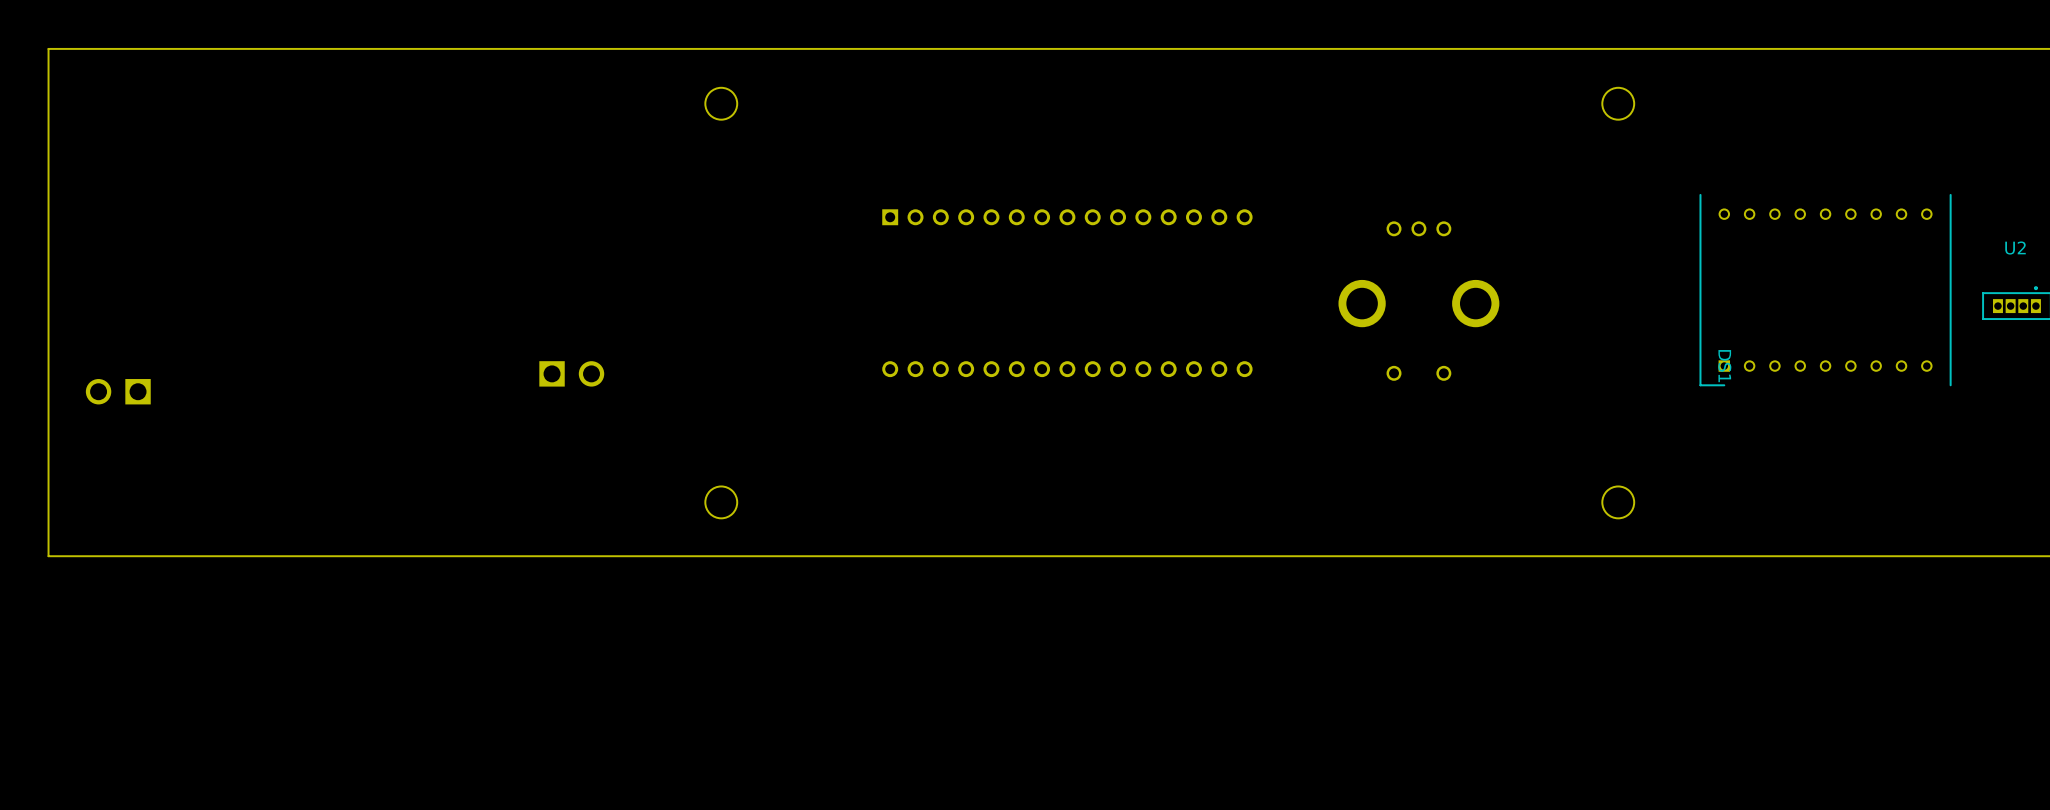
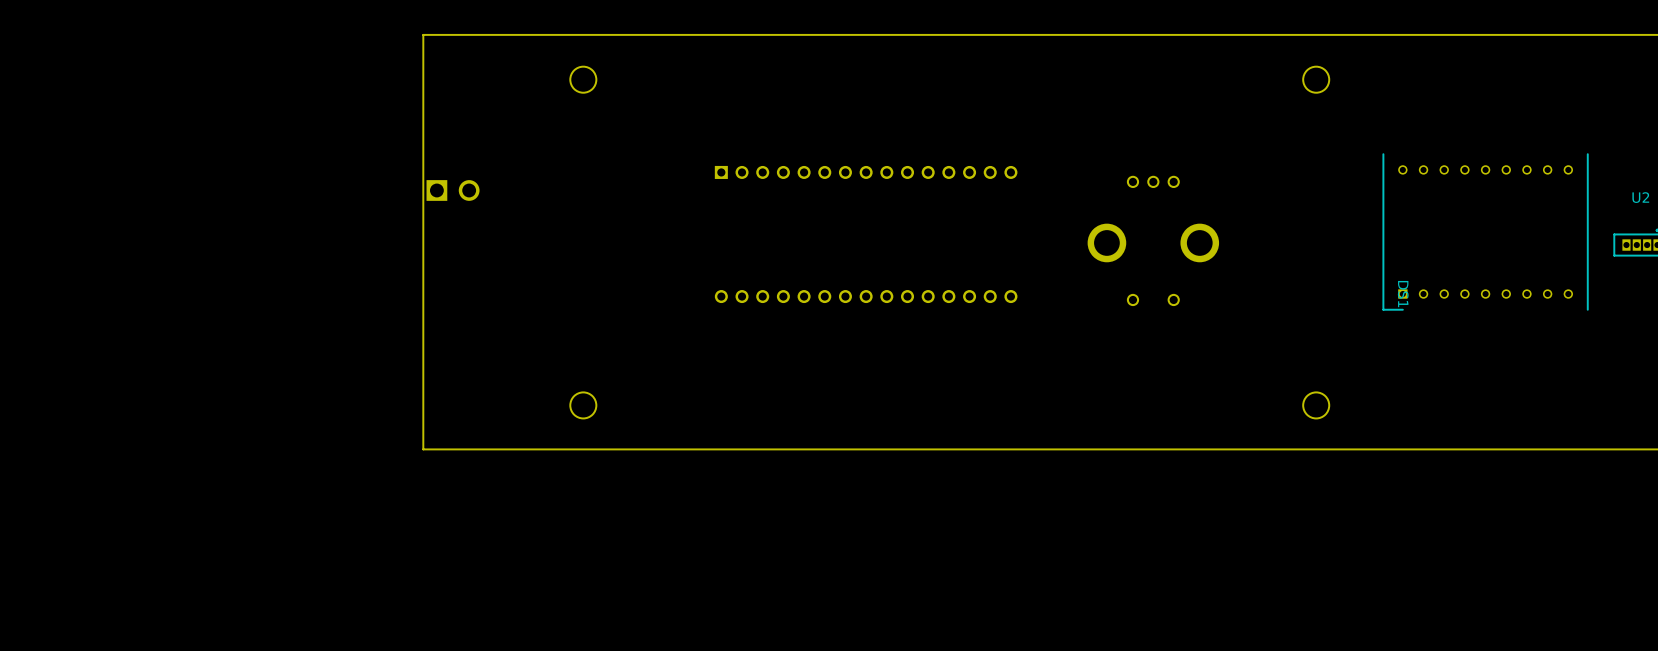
board edge: (525, 48) (48, 48) (48, 556) (525, 556) -> (423, 34) (423, 449)
part position: (571, 373) -> (453, 190)
part: (118, 391) -> none

